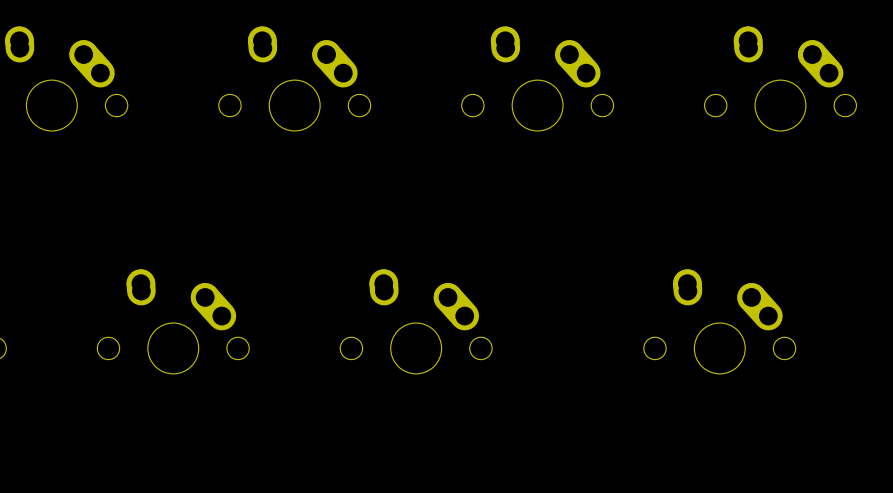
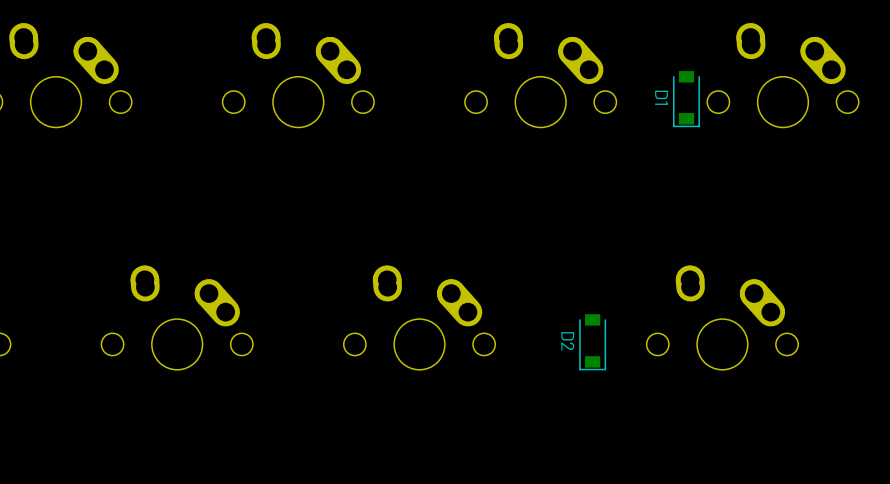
D1: none -> (686, 99)
D2: none -> (592, 342)

